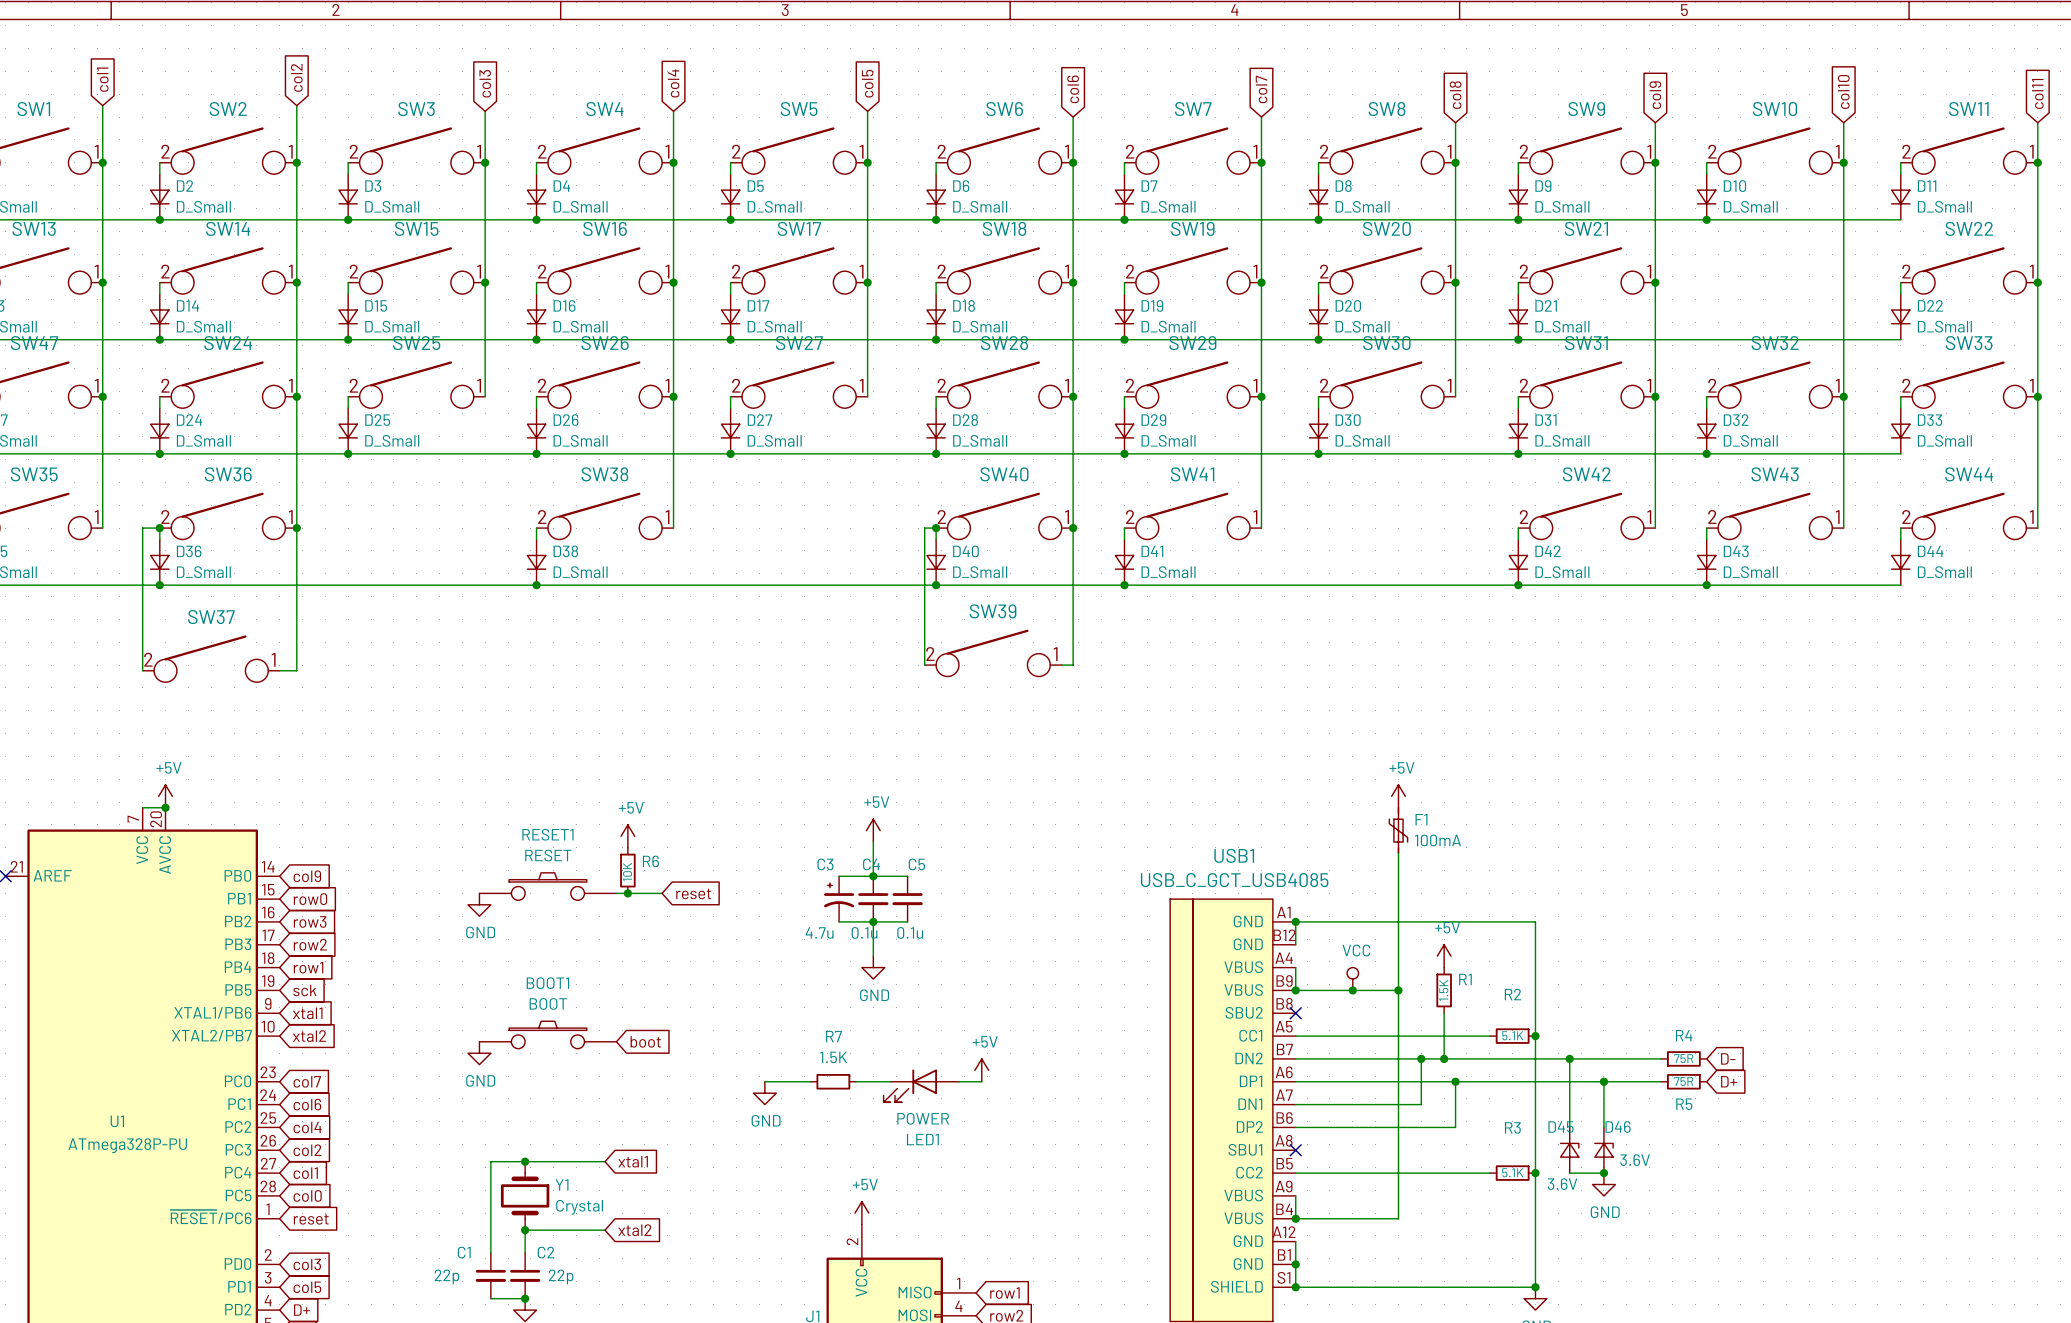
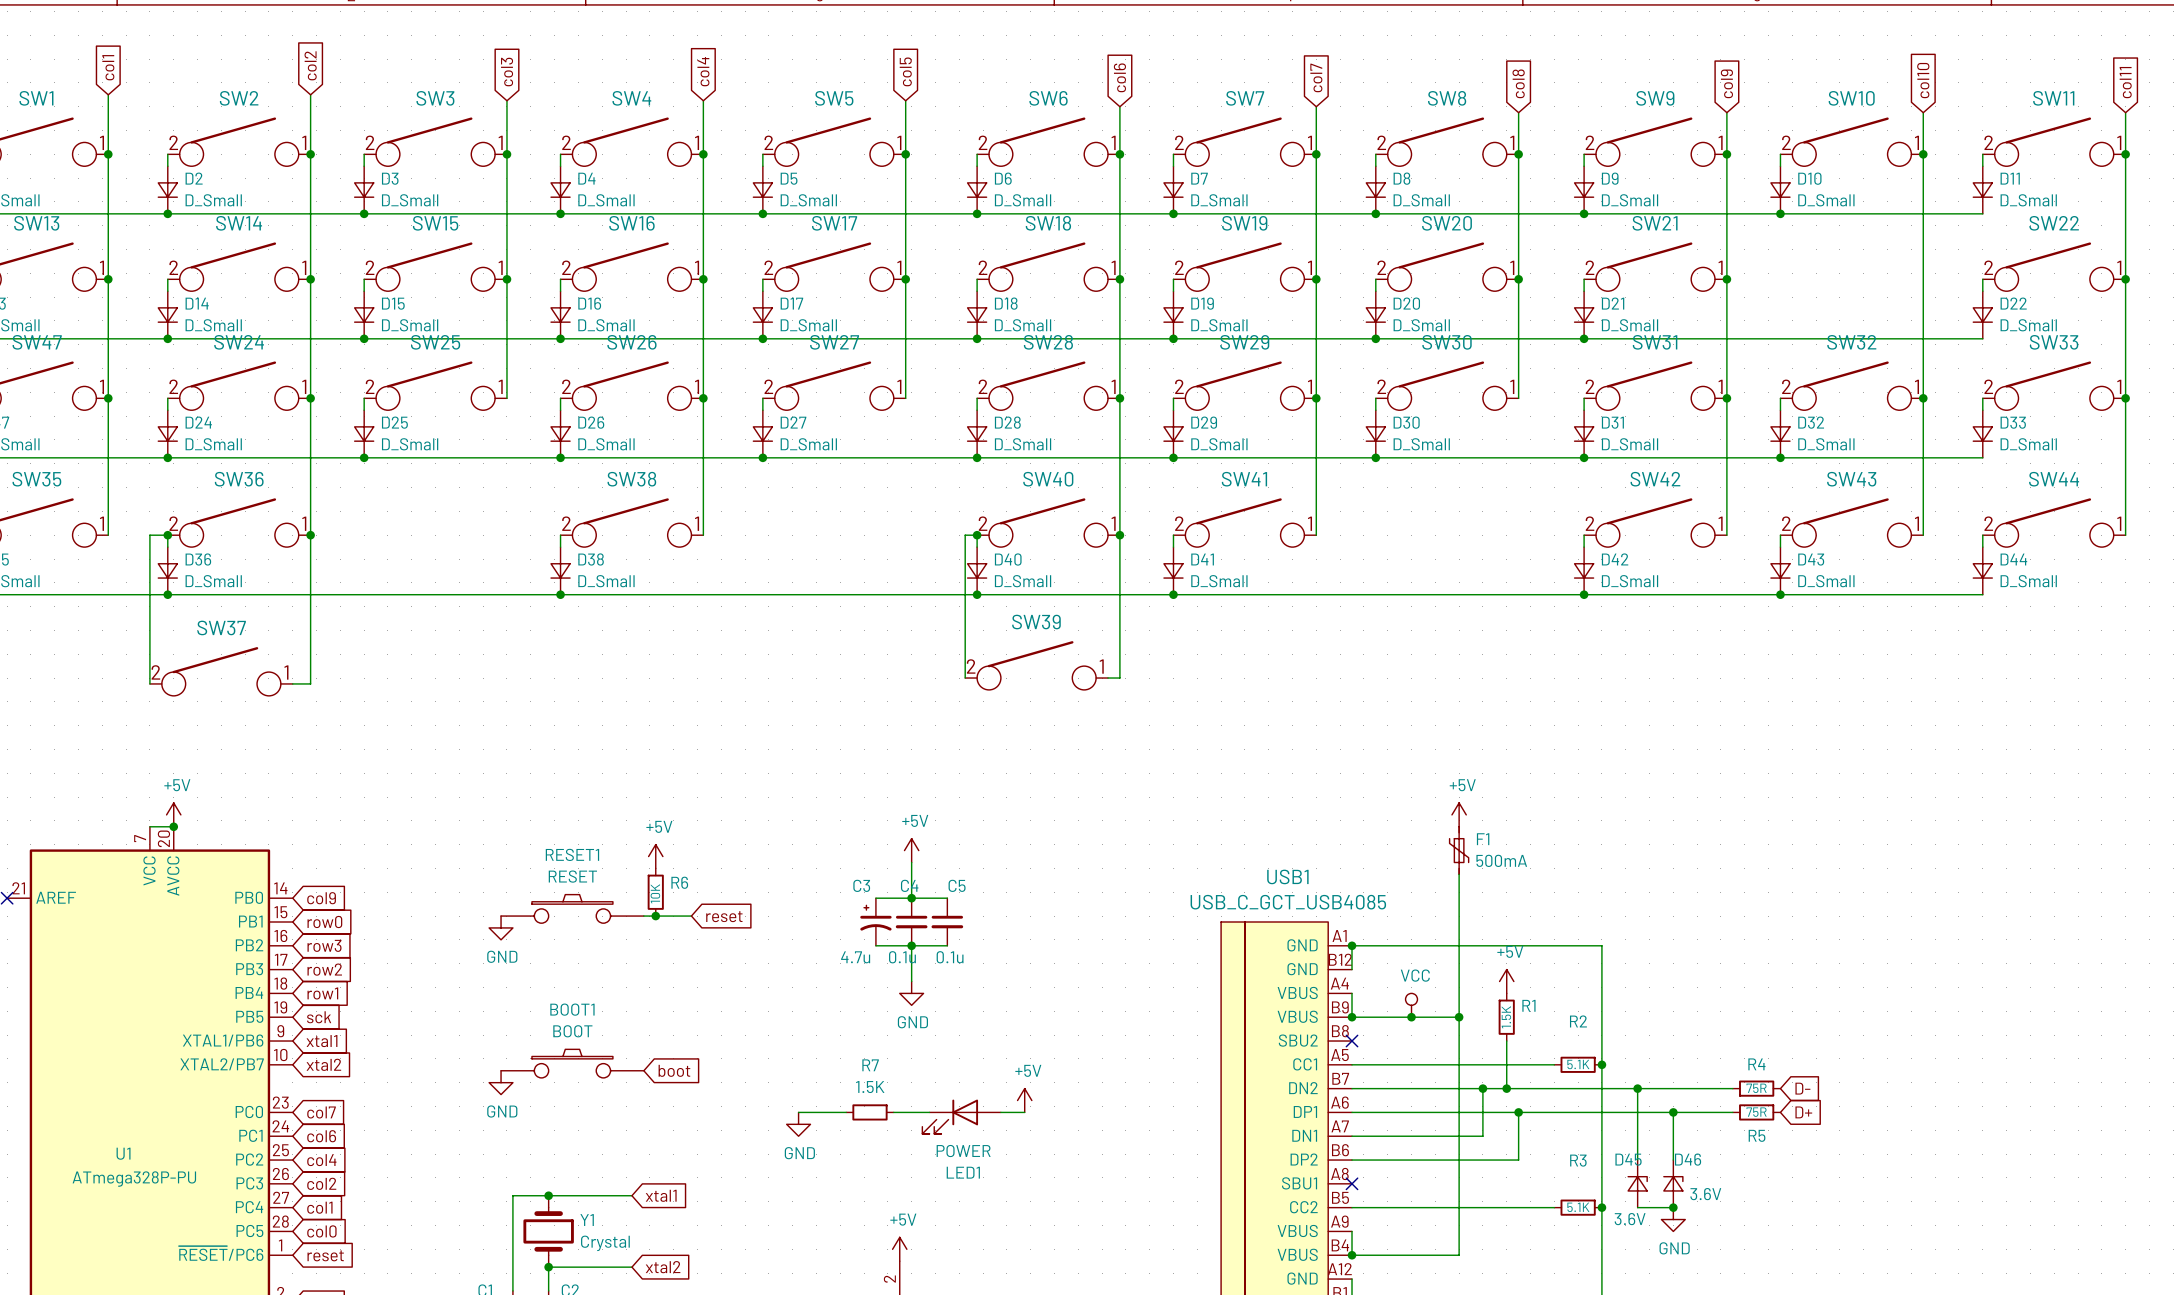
F1 value: 100mA (1437, 840) -> 500mA (1501, 860)

